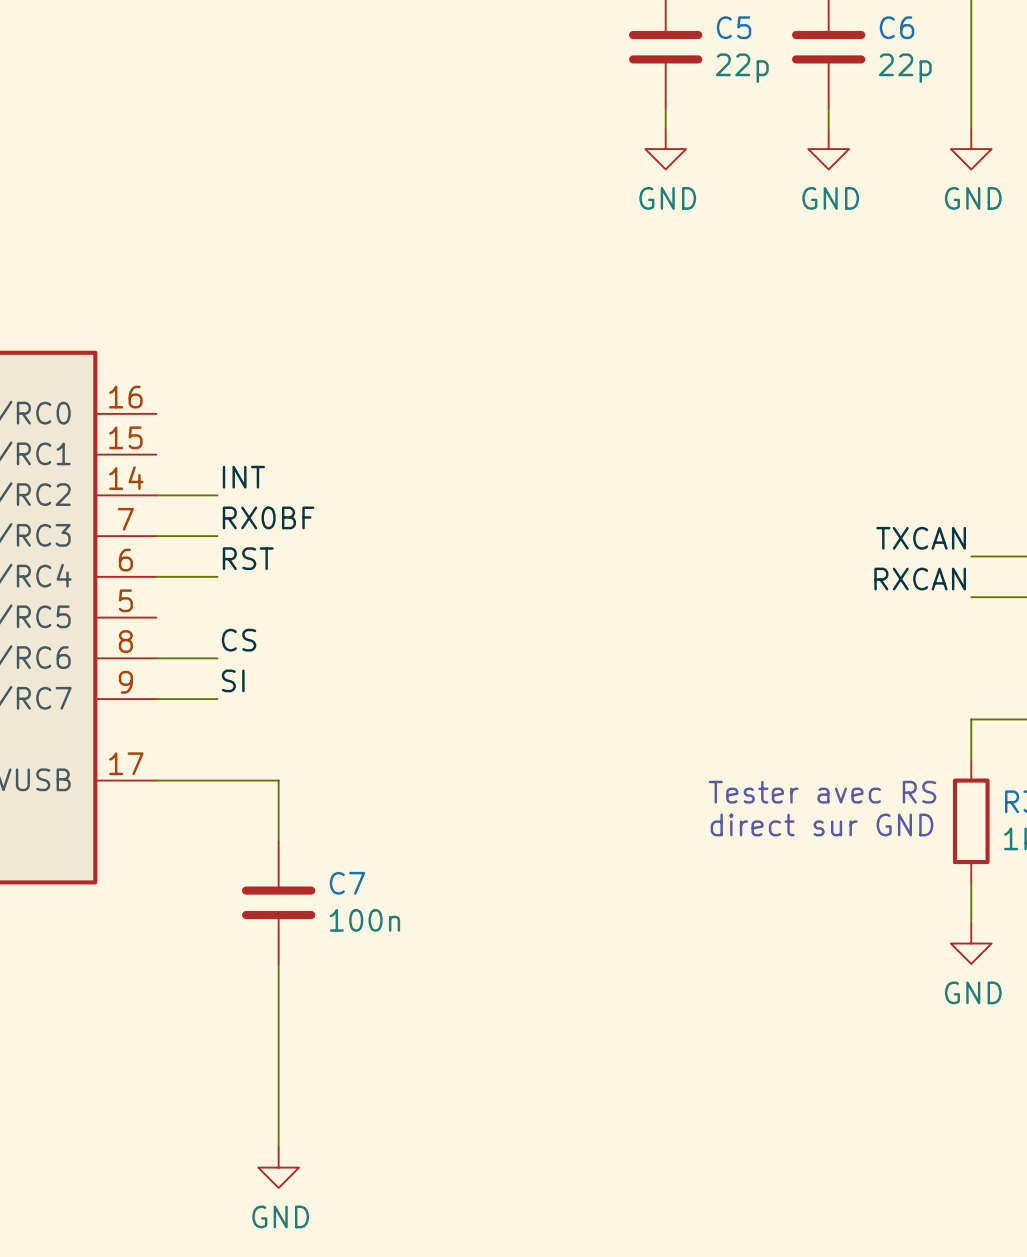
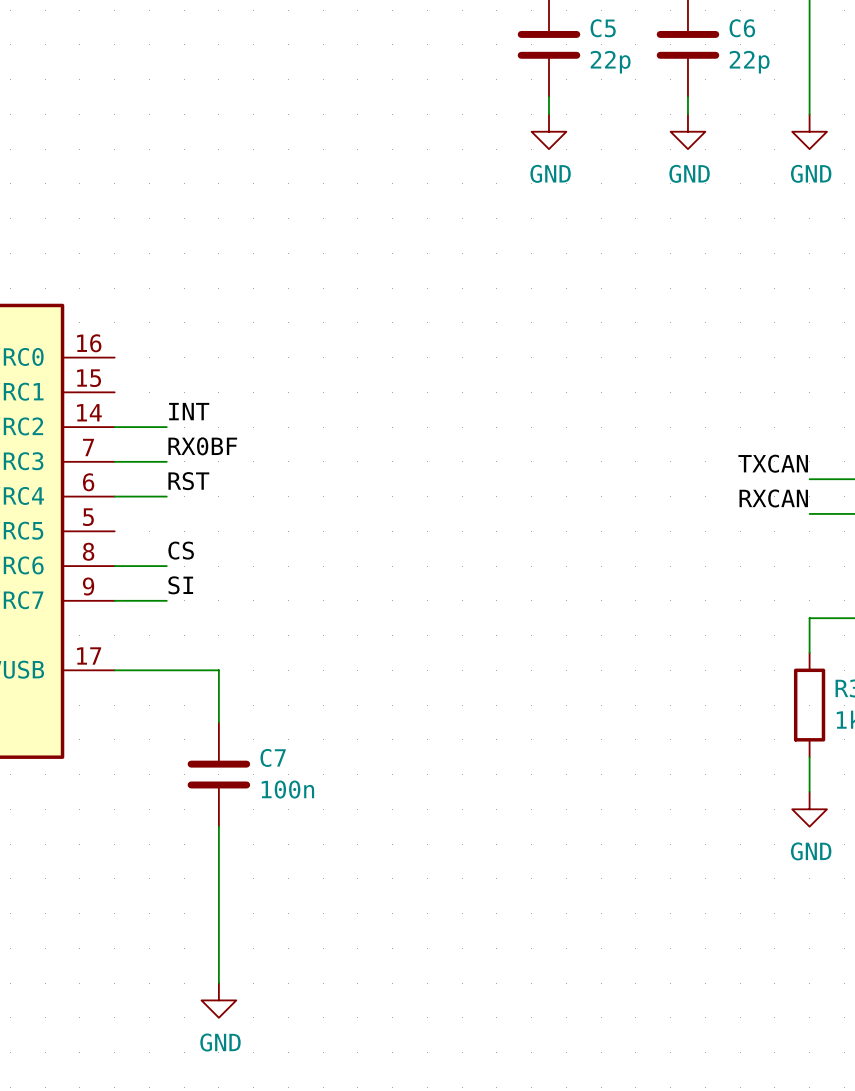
text: Tester avec RS (822, 792) -> none
text: direct sur GND (822, 824) -> none

